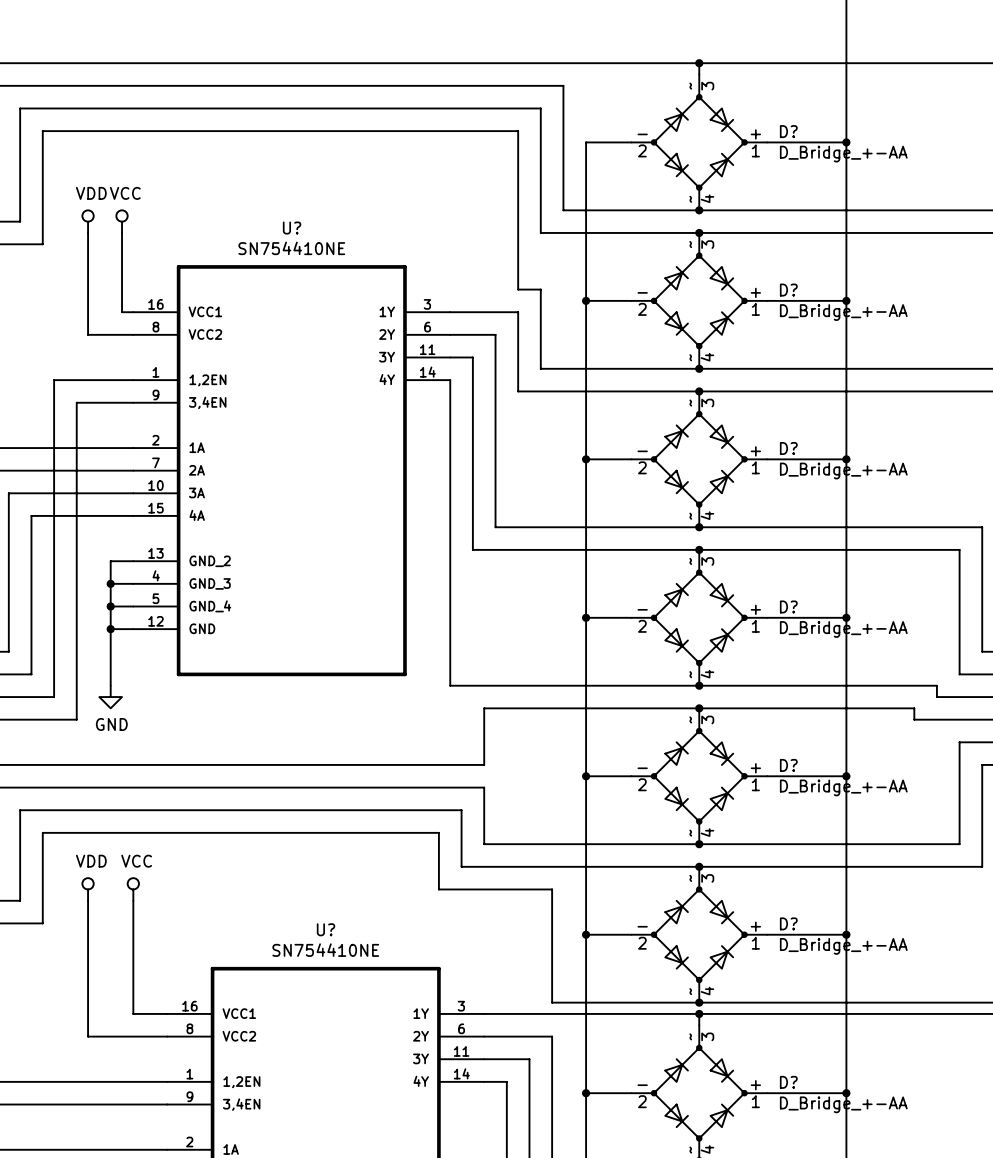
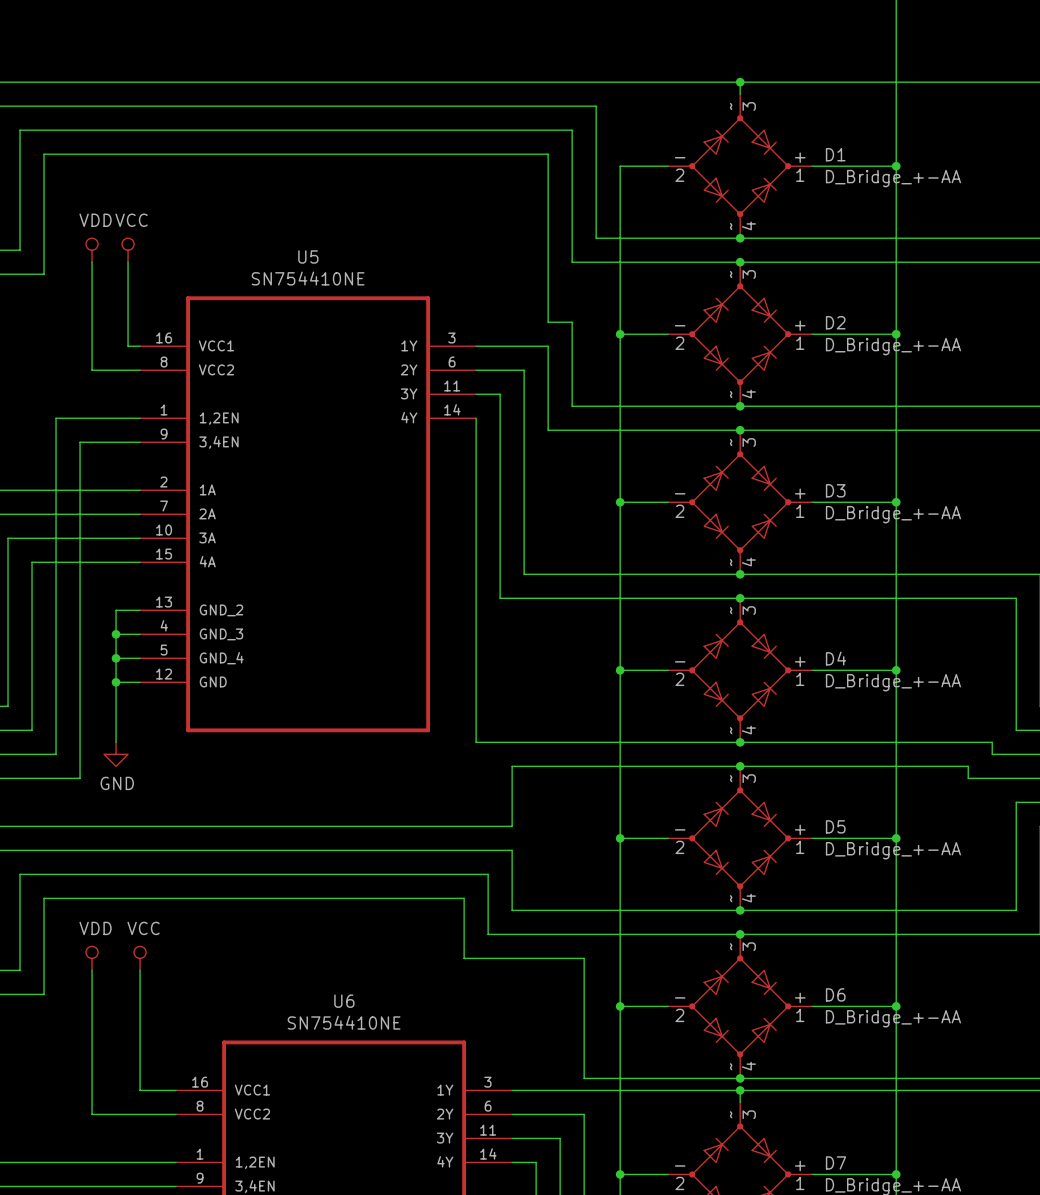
D? name: D? (788, 131) -> D1 (835, 154)
U? name: U? (292, 228) -> U5 (308, 256)
D? name: D? (788, 290) -> D2 (835, 322)
D? name: D? (788, 448) -> D3 (835, 490)
D? name: D? (788, 606) -> D4 (836, 658)
D? name: D? (788, 765) -> D5 (835, 826)
D? name: D? (788, 923) -> D6 (835, 994)
U? name: U? (326, 929) -> U6 (344, 1001)
D? name: D? (788, 1082) -> D7 (836, 1162)

